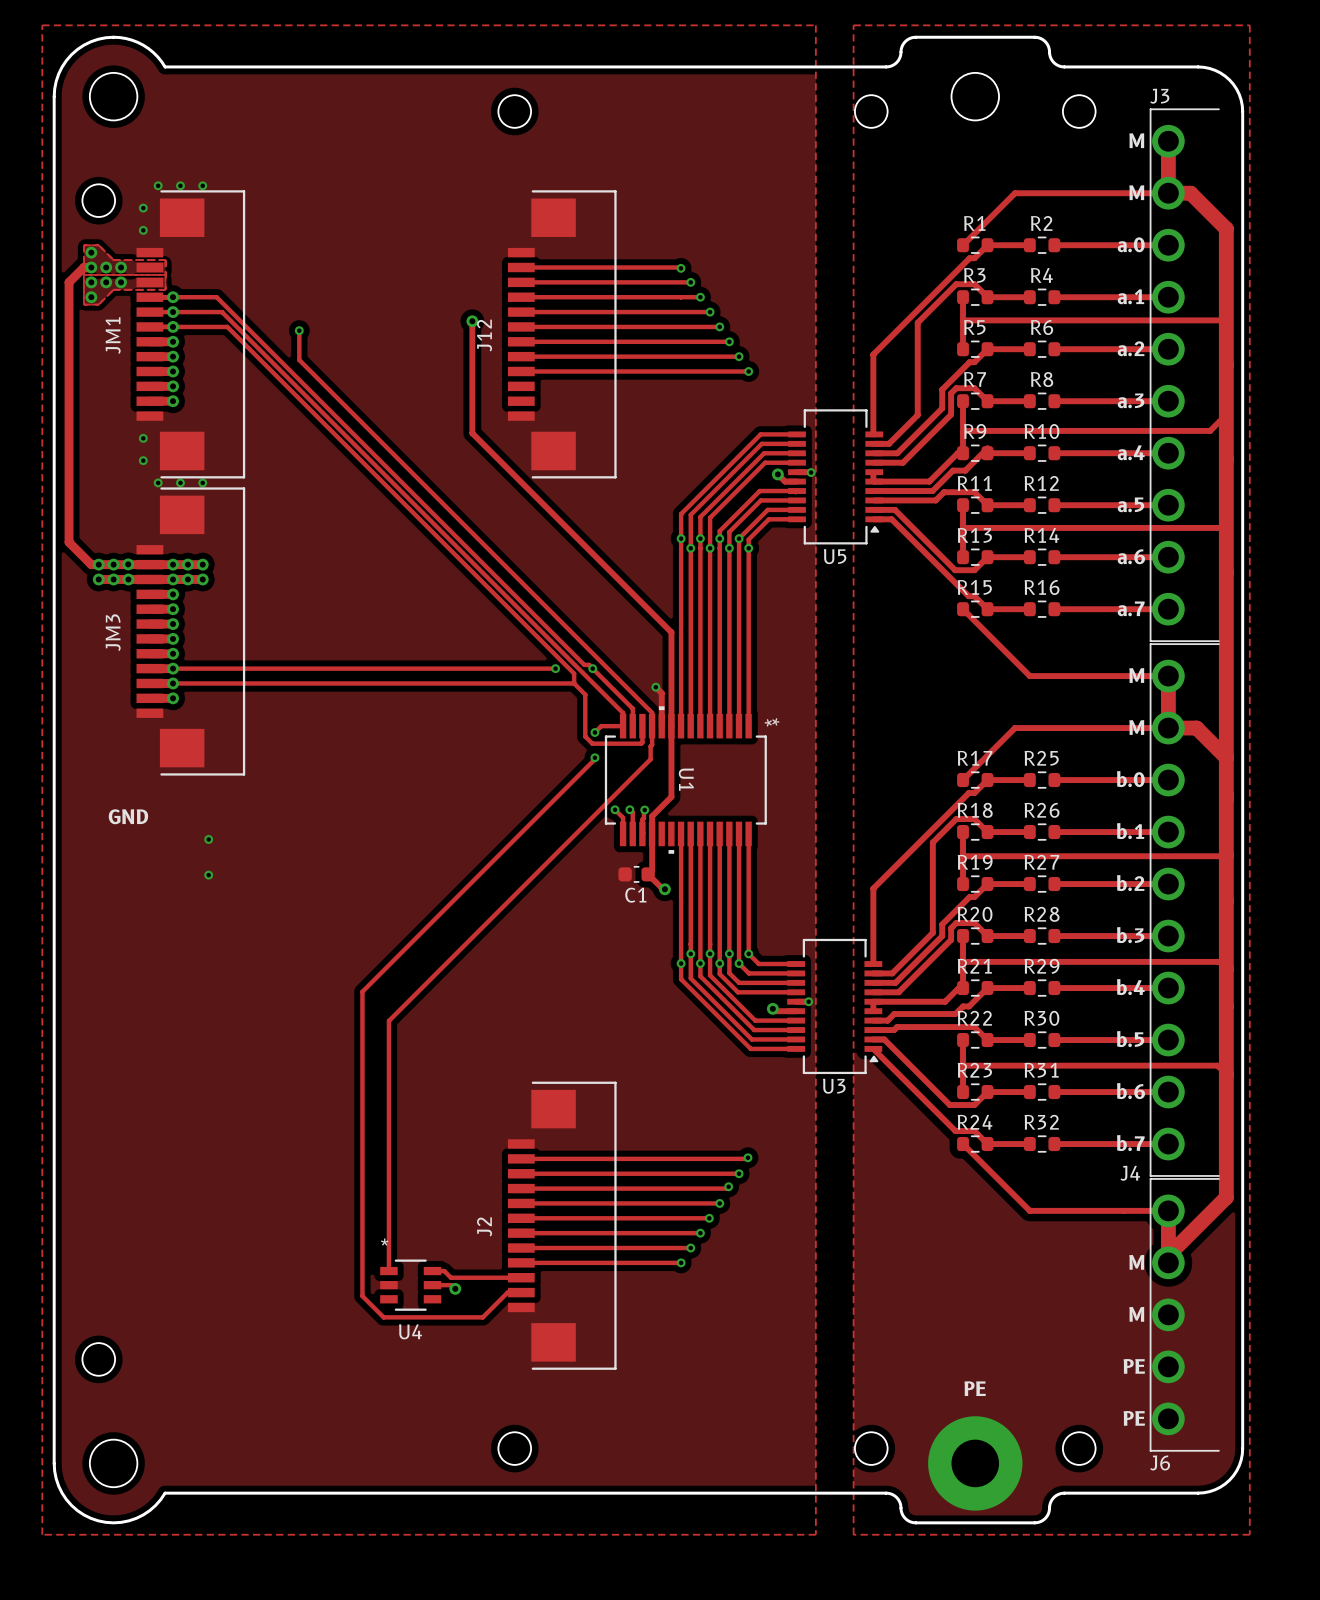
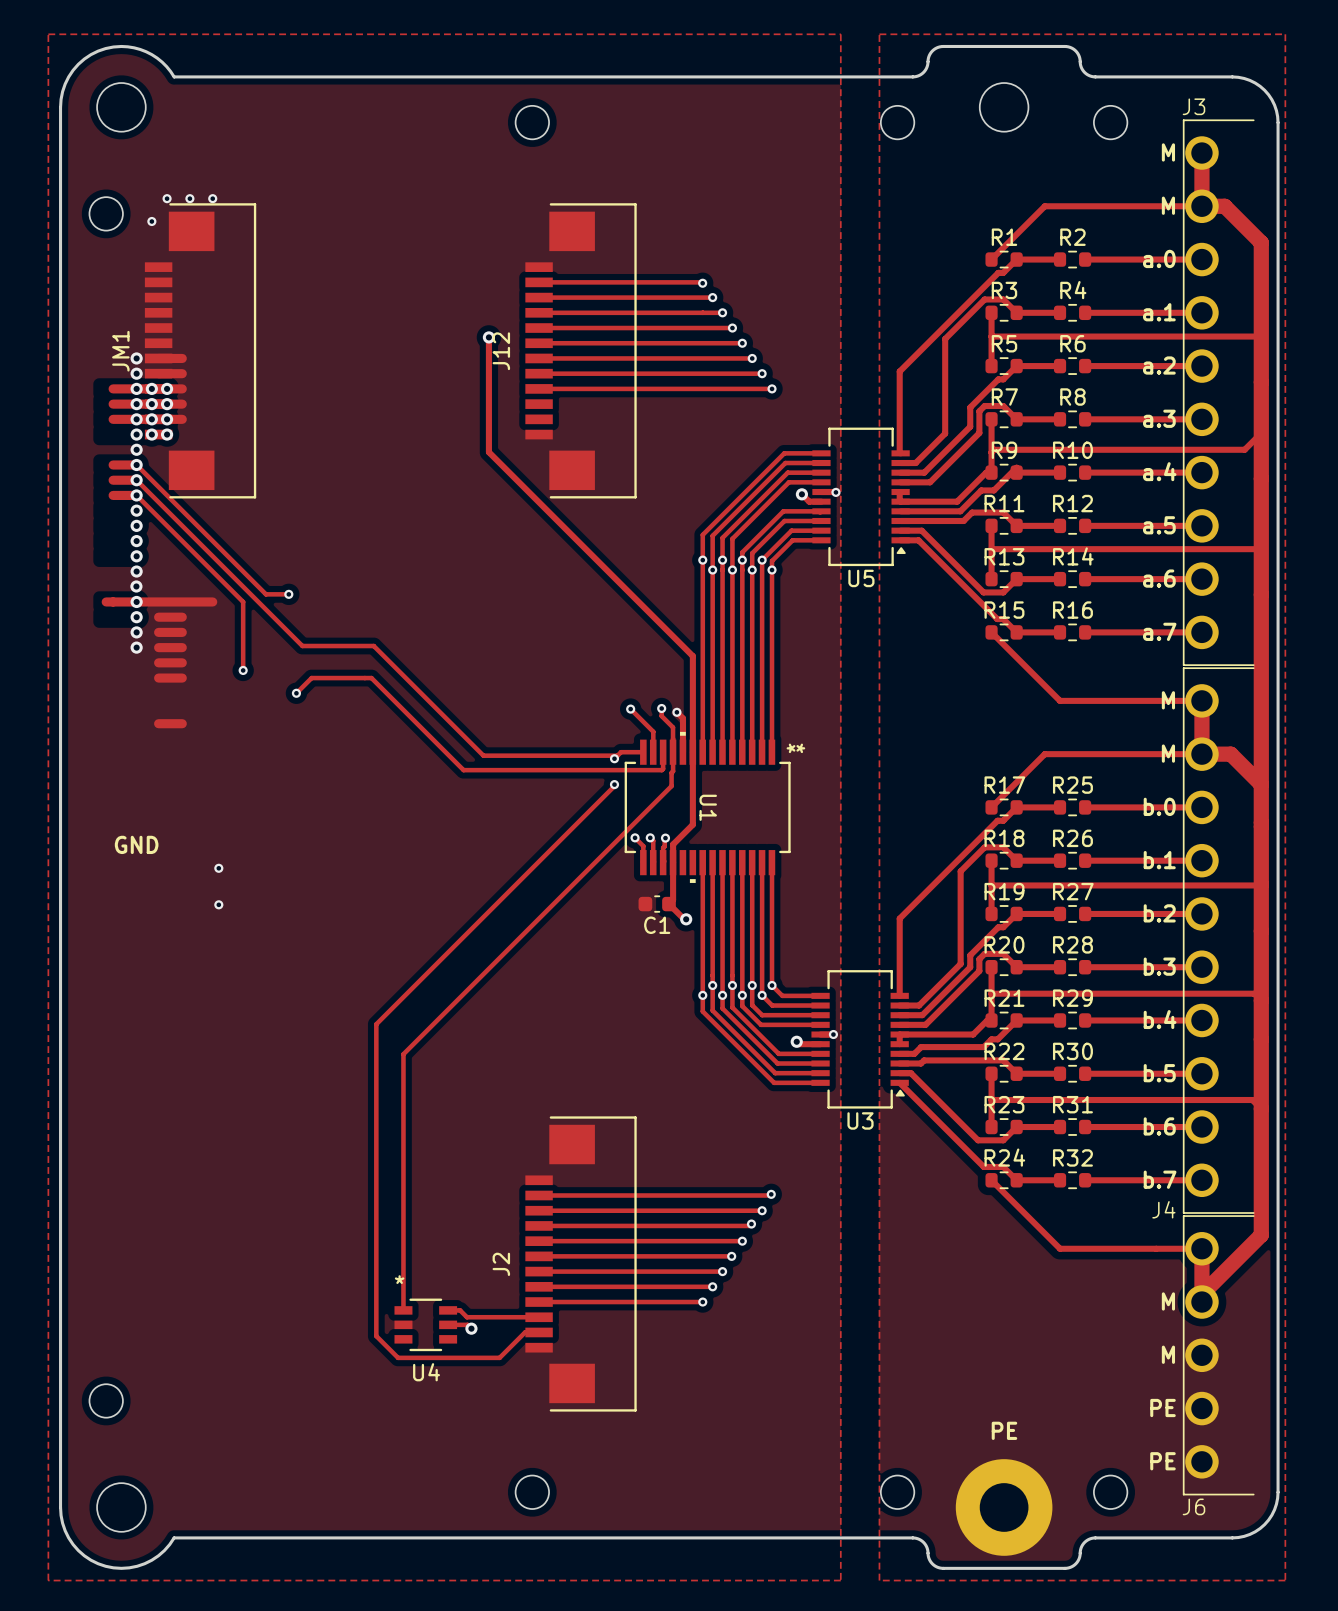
via: (143, 230) -> none
zone outline: (83, 245) (98, 245) (113, 260) (165, 260) (165, 289) (113, 289) (98, 304) (83, 304) (83, 245) -> none
via: (91, 252) -> none
track: (91, 267) (83, 267) (69, 282) (69, 542) (91, 564) (202, 564) -> none
via: (91, 267) -> none
via: (106, 267) -> none
via: (121, 267) -> none
zone outline: (83, 274) (165, 274) -> none
via: (91, 282) -> none
via: (106, 282) -> none
via: (121, 282) -> none
via: (91, 297) -> none
track: (149, 297) (216, 297) (584, 664) (589, 664) (632, 708) -> (630, 709) (653, 731) (653, 734)
via: (173, 297) -> none
track: (149, 312) (222, 312) (623, 713) (623, 726) -> none
via: (173, 312) -> none
track: (149, 326) (227, 326) (574, 673) (574, 683) -> none
via: (173, 326) -> none
track: (299, 330) (299, 360) (652, 712) -> (661, 708) (661, 716) (673, 727) (673, 738)
via: (299, 330) -> none
via: none -> (136, 358)
via: (173, 341) -> none
via: none -> (136, 373)
via: (173, 356) -> none
track: none -> (113, 388) (158, 388)
via: none -> (136, 388)
via: none -> (151, 388)
via: none -> (167, 388)
via: (173, 371) -> none
track: none -> (113, 404) (158, 404)
via: none -> (136, 404)
via: none -> (151, 404)
via: none -> (167, 404)
via: (173, 386) -> none
track: none -> (113, 419) (158, 419)
via: none -> (136, 419)
via: none -> (151, 419)
via: none -> (167, 419)
via: (173, 401) -> none
via: none -> (136, 434)
via: none -> (151, 434)
via: none -> (167, 434)
via: none -> (136, 449)
via: (143, 438) -> none
track: none -> (113, 464) (136, 464) (265, 594) (288, 594)
via: none -> (136, 464)
track: none -> (113, 480) (136, 480) (302, 646) (373, 646) (483, 755) (617, 755)
via: none -> (136, 480)
via: (143, 460) -> none
track: none -> (113, 495) (136, 495) (243, 601) (243, 670)
via: none -> (136, 495)
via: (158, 482) -> none
via: (180, 482) -> none
via: (202, 482) -> none
via: none -> (136, 510)
via: none -> (136, 525)
via: none -> (136, 541)
via: none -> (136, 556)
via: none -> (136, 571)
via: (98, 564) -> none
via: (113, 564) -> none
via: (173, 564) -> none
via: (187, 564) -> none
via: (202, 564) -> none
via: none -> (288, 594)
via: (98, 579) -> none
via: (113, 579) -> none
via: (173, 579) -> none
via: (187, 579) -> none
via: (202, 579) -> none
via: none -> (136, 617)
via: (173, 594) -> none
via: none -> (136, 632)
via: (173, 609) -> none
via: none -> (136, 647)
via: (173, 624) -> none
JM3: (190, 631) -> none
via: (173, 638) -> none
via: none -> (243, 670)
via: (173, 653) -> none
track: (149, 668) (555, 668) -> none
via: (173, 668) -> none
via: none -> (296, 693)
via: (555, 668) -> none
via position: (592, 668) -> (630, 709)
track: (149, 683) (574, 683) -> none
via: (173, 683) -> none
track: (574, 683) (585, 694) (585, 736) (592, 743) -> (296, 693) (311, 678) (371, 678) (463, 770) (611, 770)
via: none -> (661, 708)
via: (173, 698) -> none

